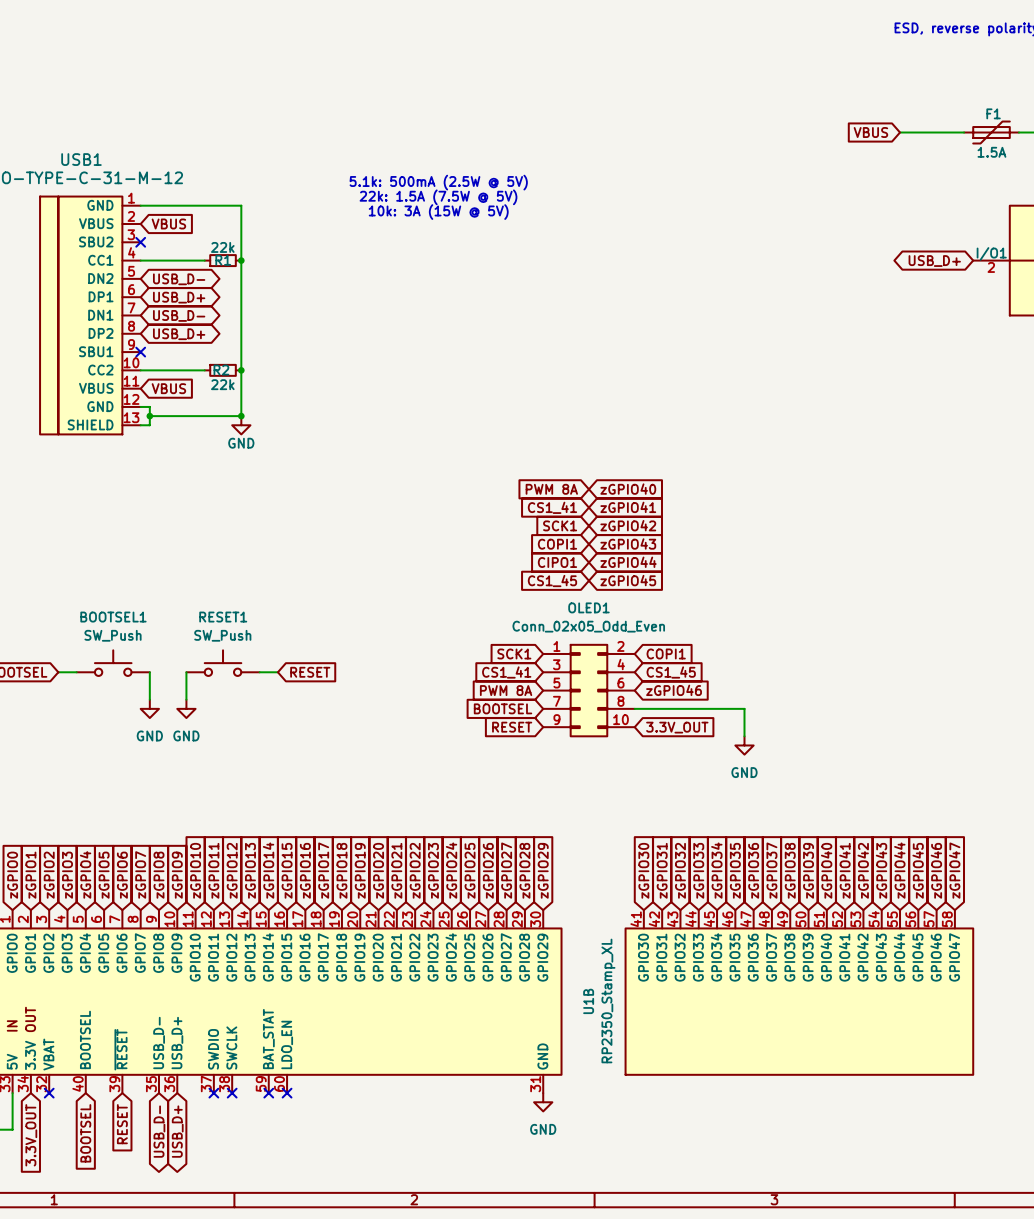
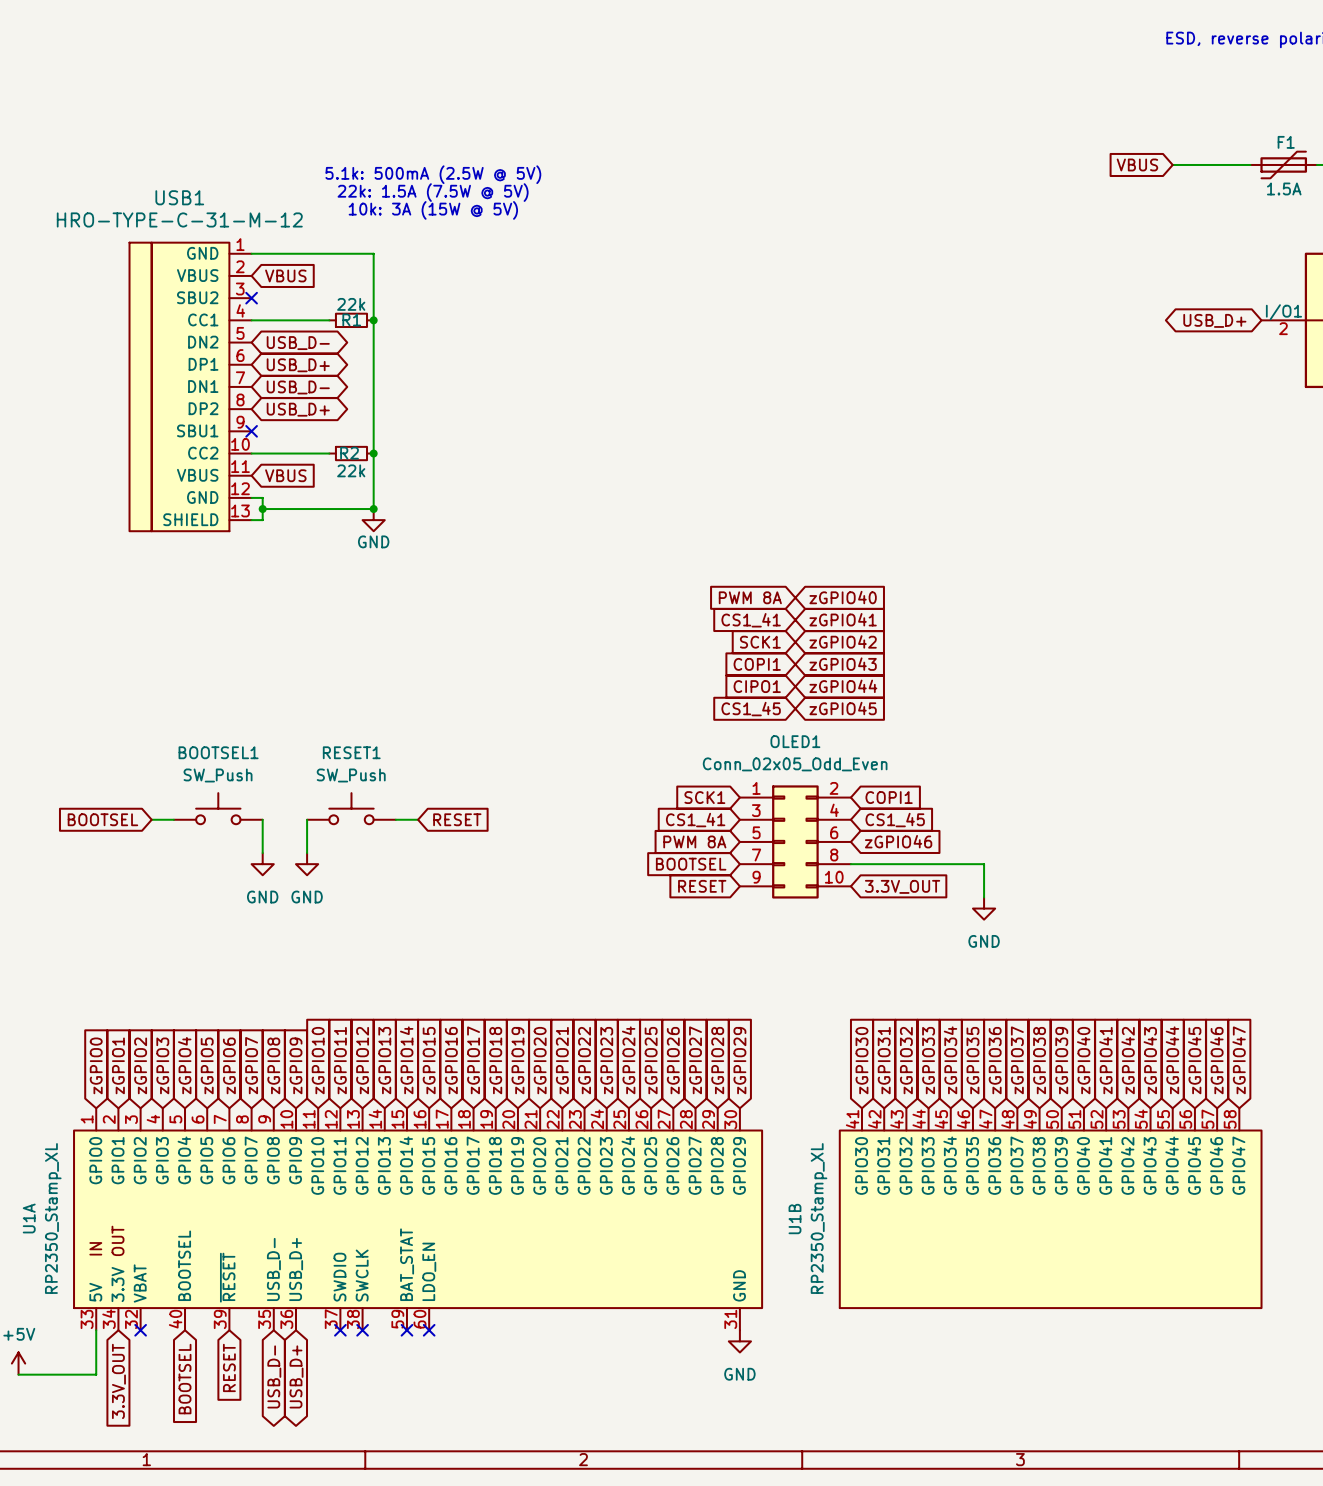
text position: 5.1k: 500mA (2.5W @ 5V) (438, 182) -> 5.1k: 500mA (2.5W @ 5V) (433, 174)
text position: 22k: 1.5A (7.5W @ 5V) (438, 197) -> 22k: 1.5A (7.5W @ 5V) (433, 192)
text position: 10k: 3A (15W @ 5V) (438, 212) -> 10k: 3A (15W @ 5V) (433, 210)

